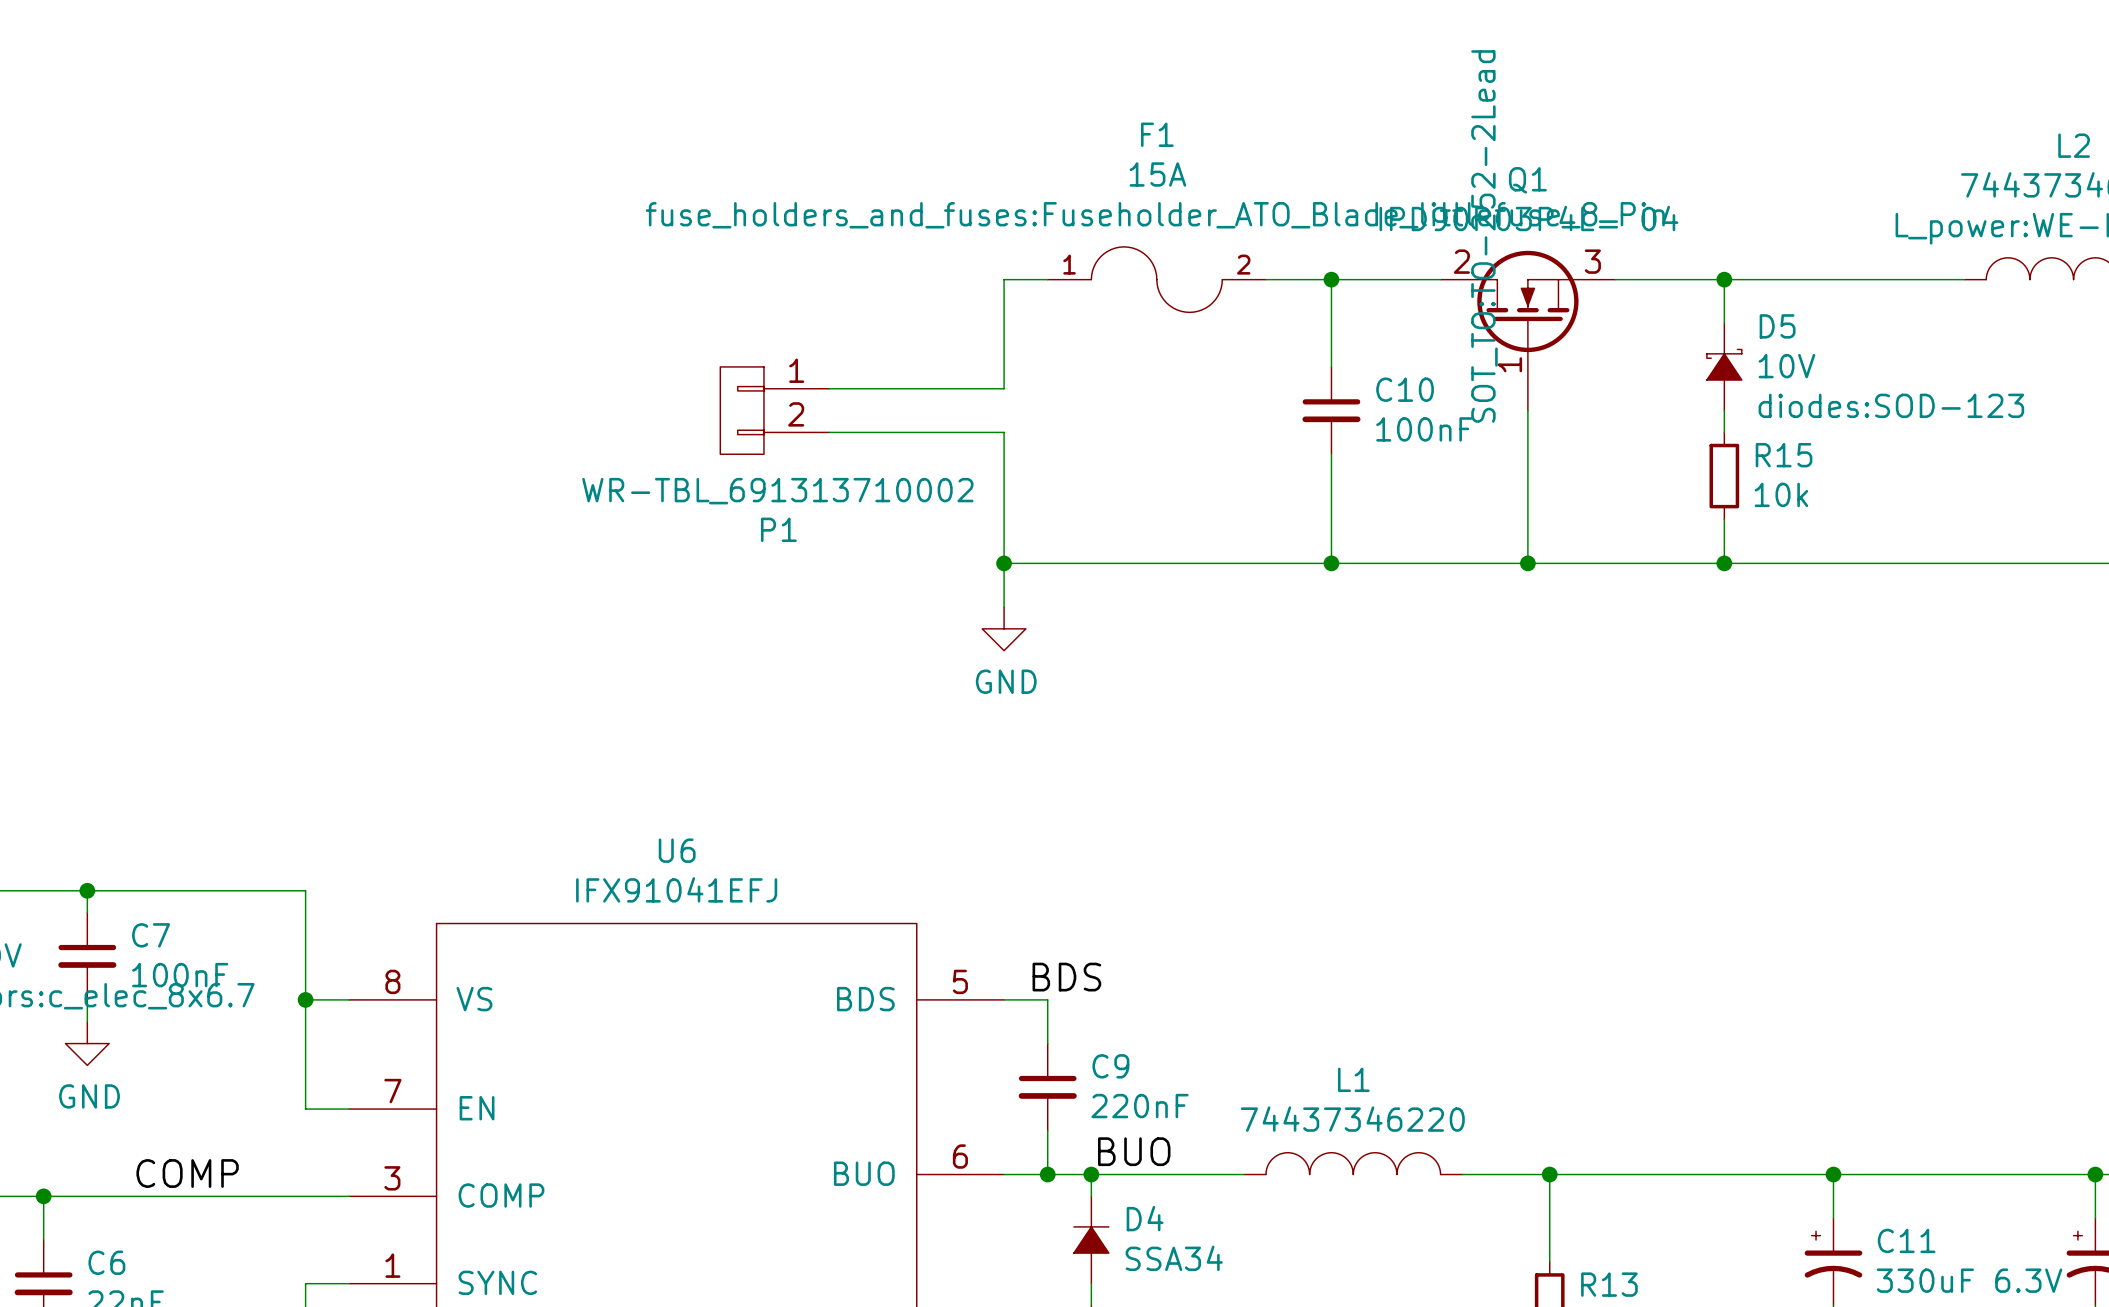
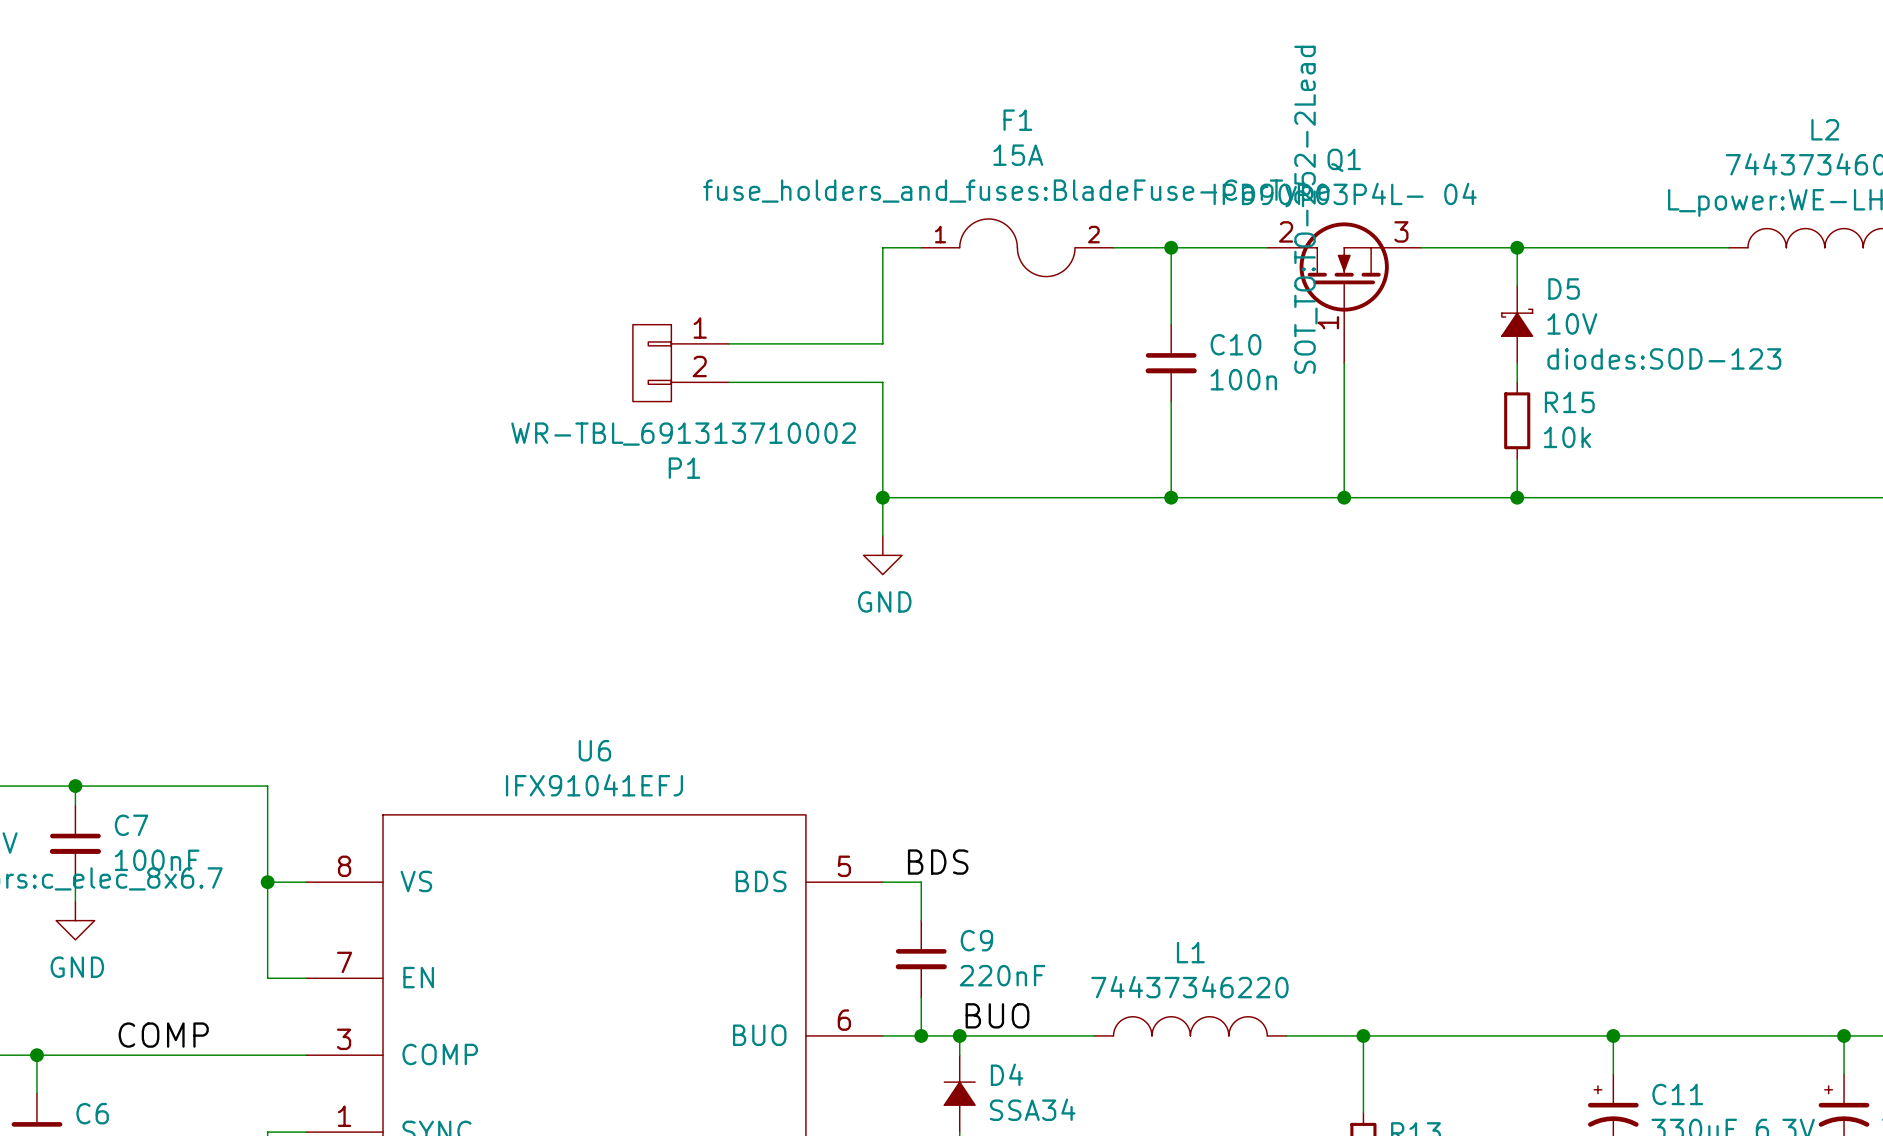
F1 text: fuse_holders_and_fuses:Fuseholder_ATO_Blade_littlefuse_8_Pin (1155, 215) -> fuse_holders_and_fuses:BladeFuse-CarType (1016, 193)
C10 value: 100nF (1424, 429) -> 100n (1243, 379)

